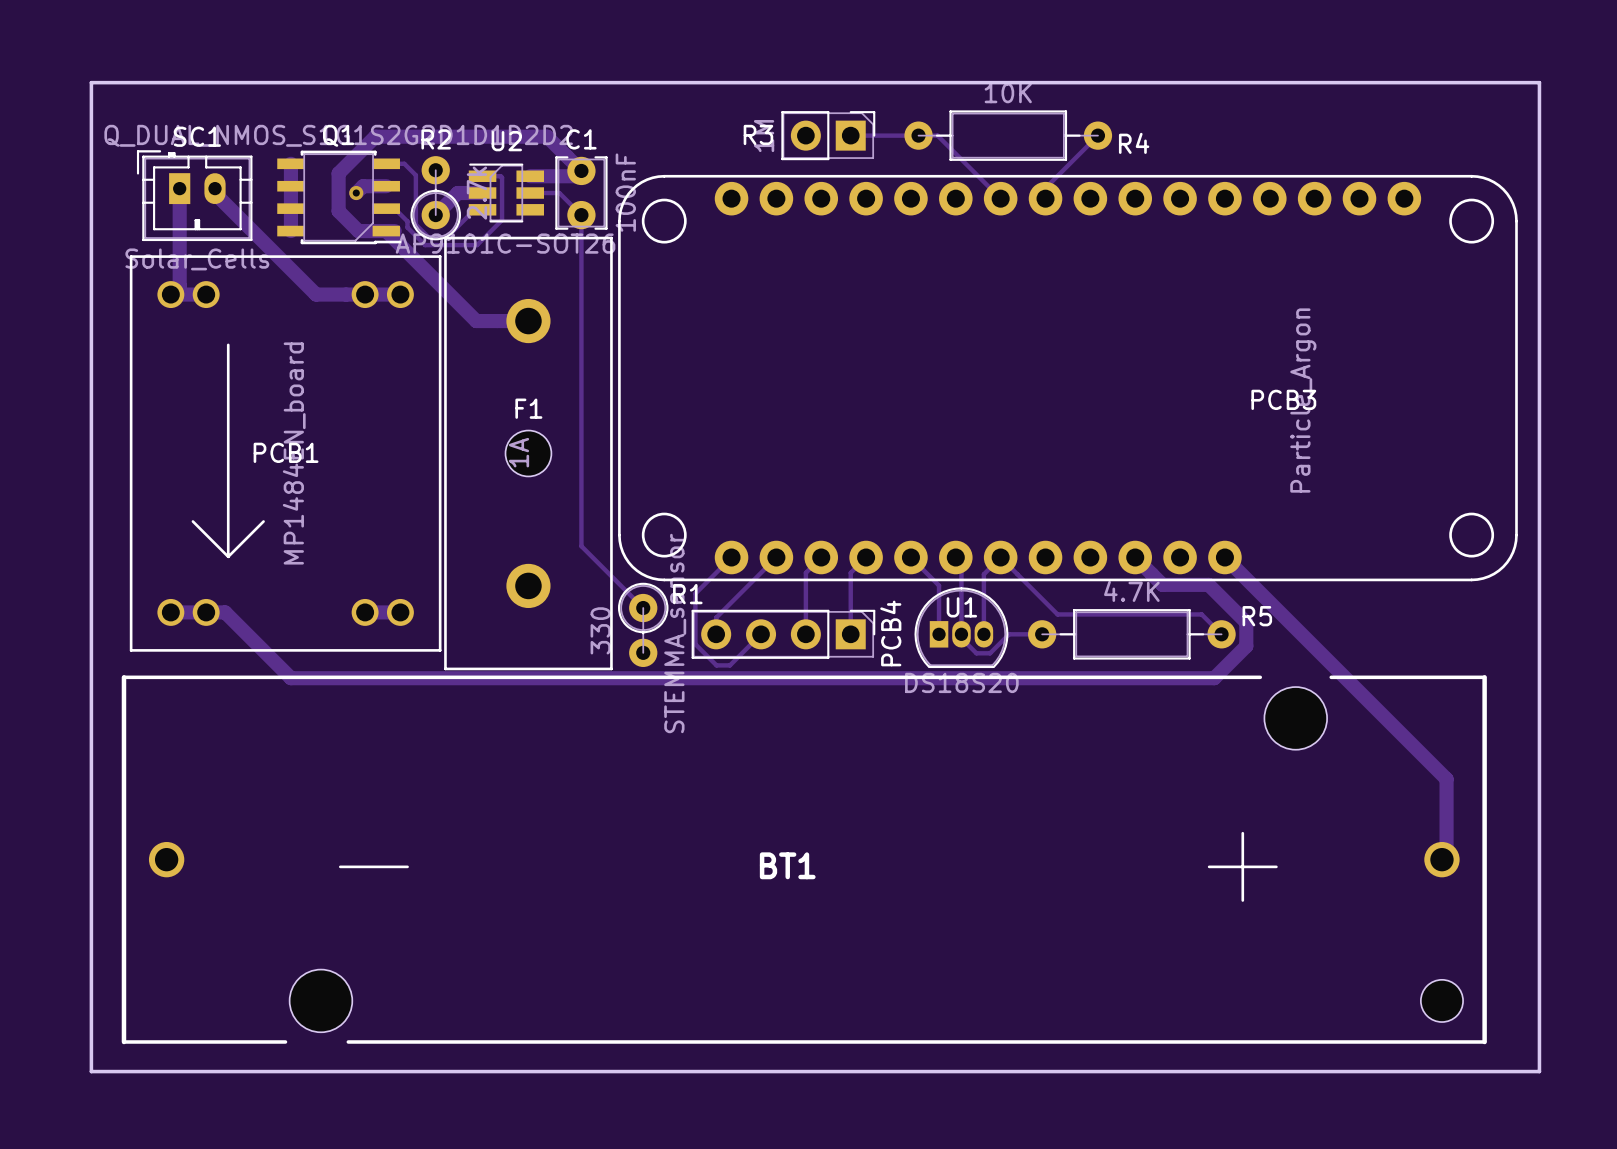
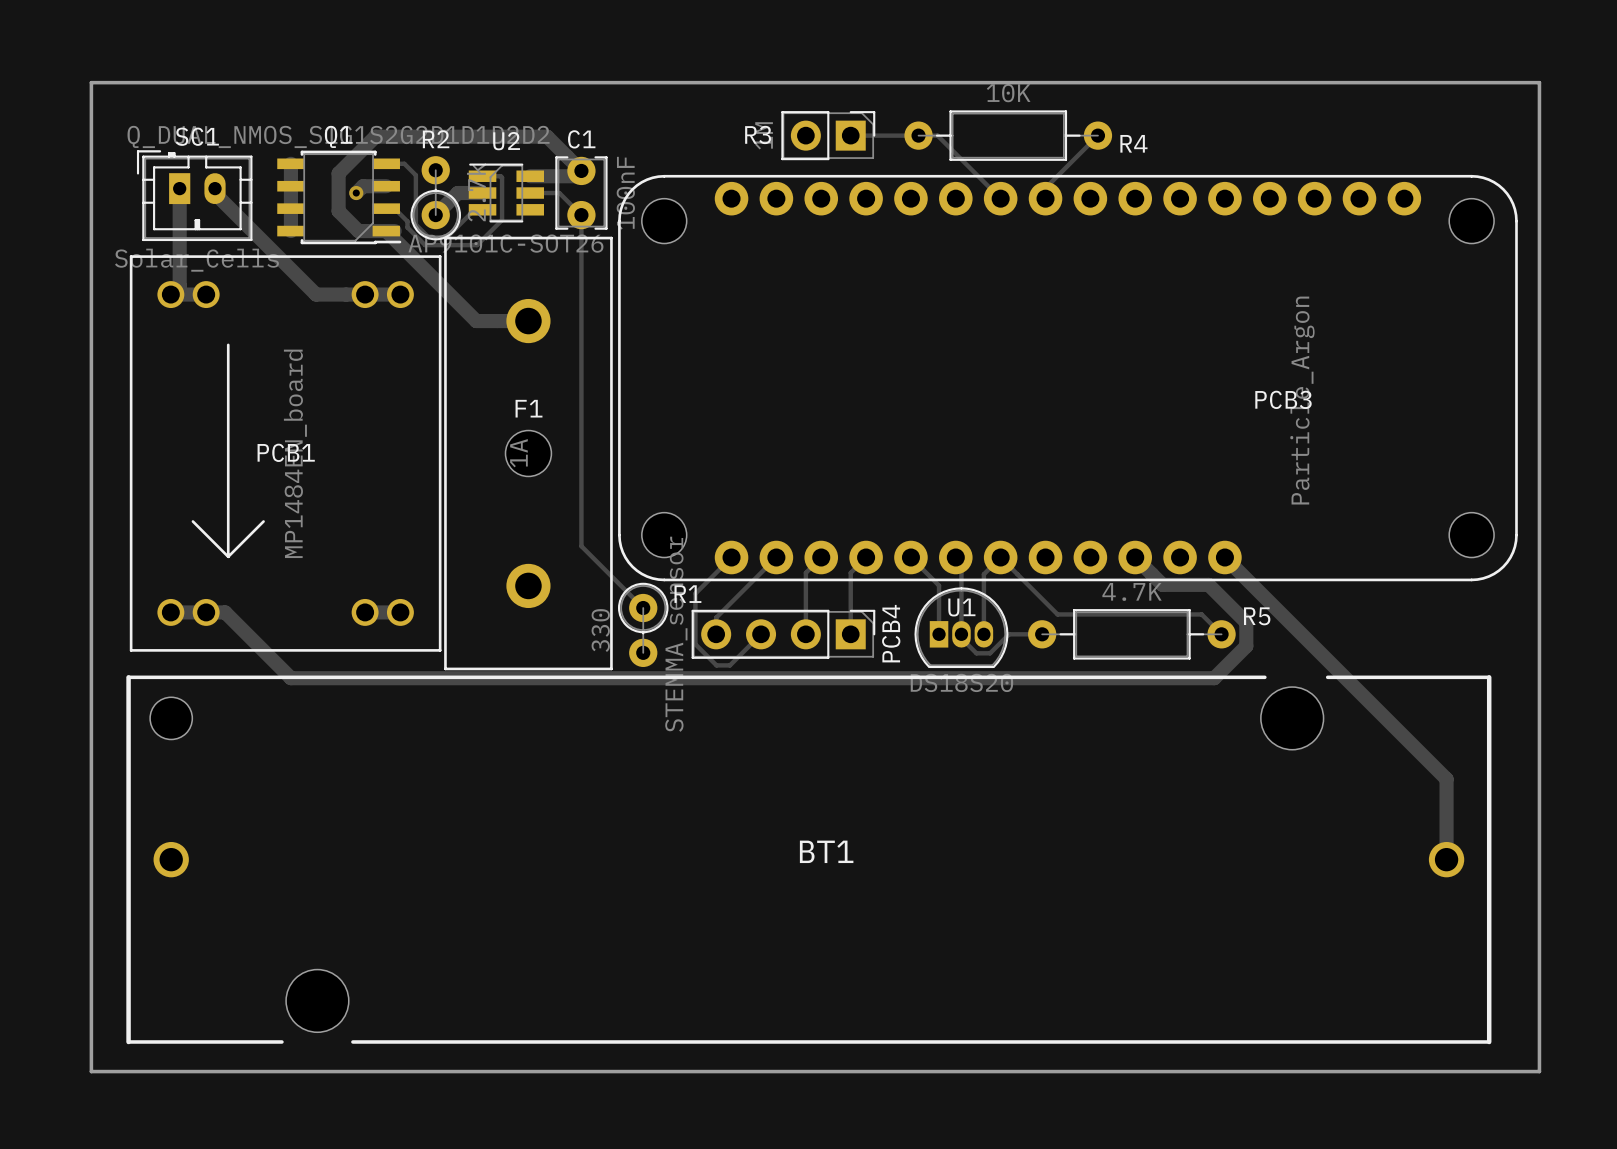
PCB3 footprint: [618, 174, 1518, 582] -> [618, 174, 1518, 582]
BT1 footprint: [121, 675, 1487, 1045] -> [126, 675, 1492, 1045]
BT1 name position: BT1 (787, 865) -> BT1 (826, 851)

